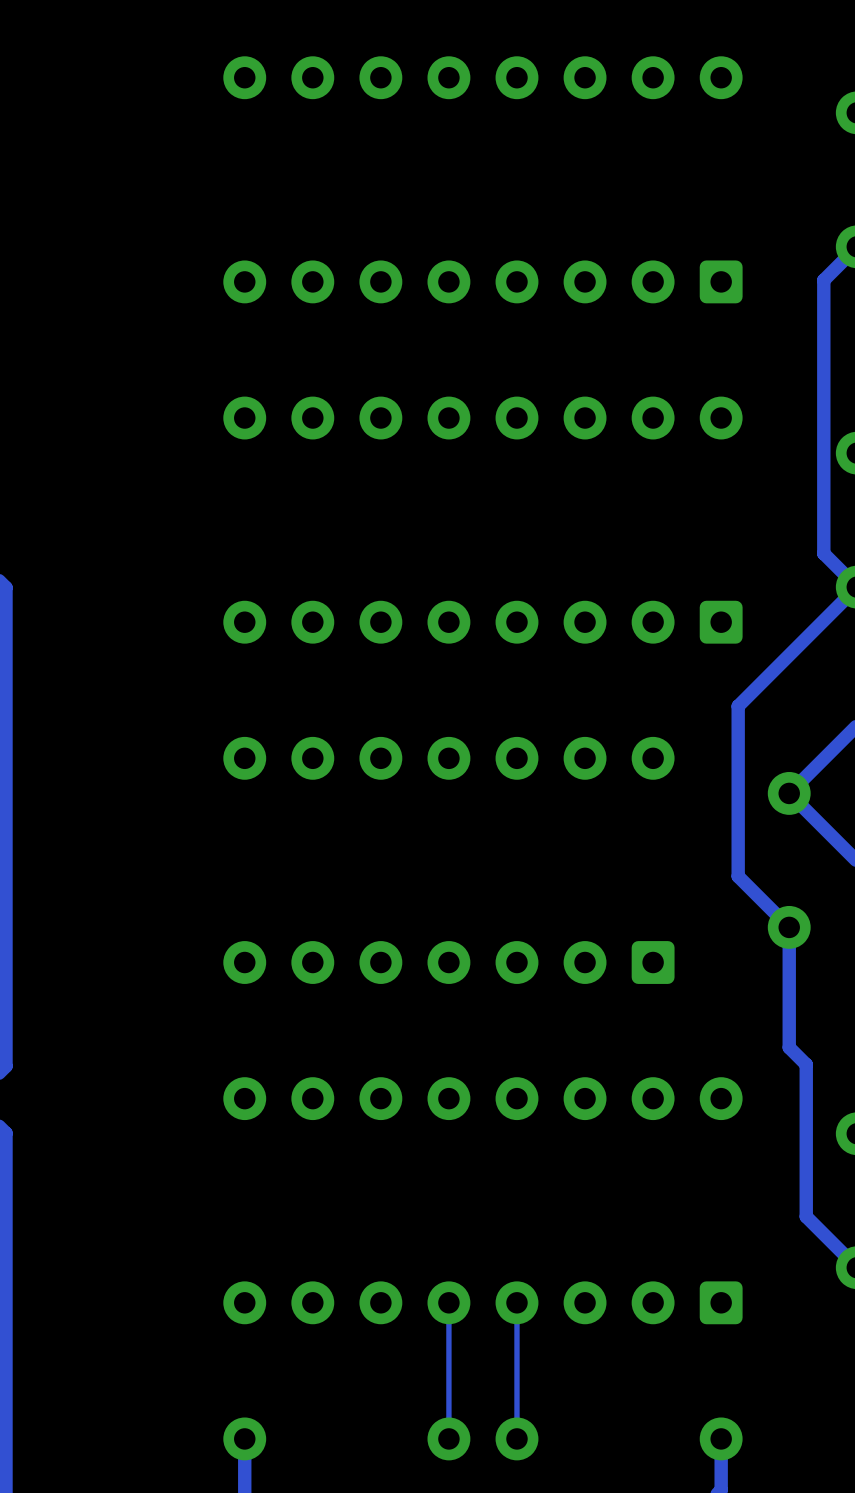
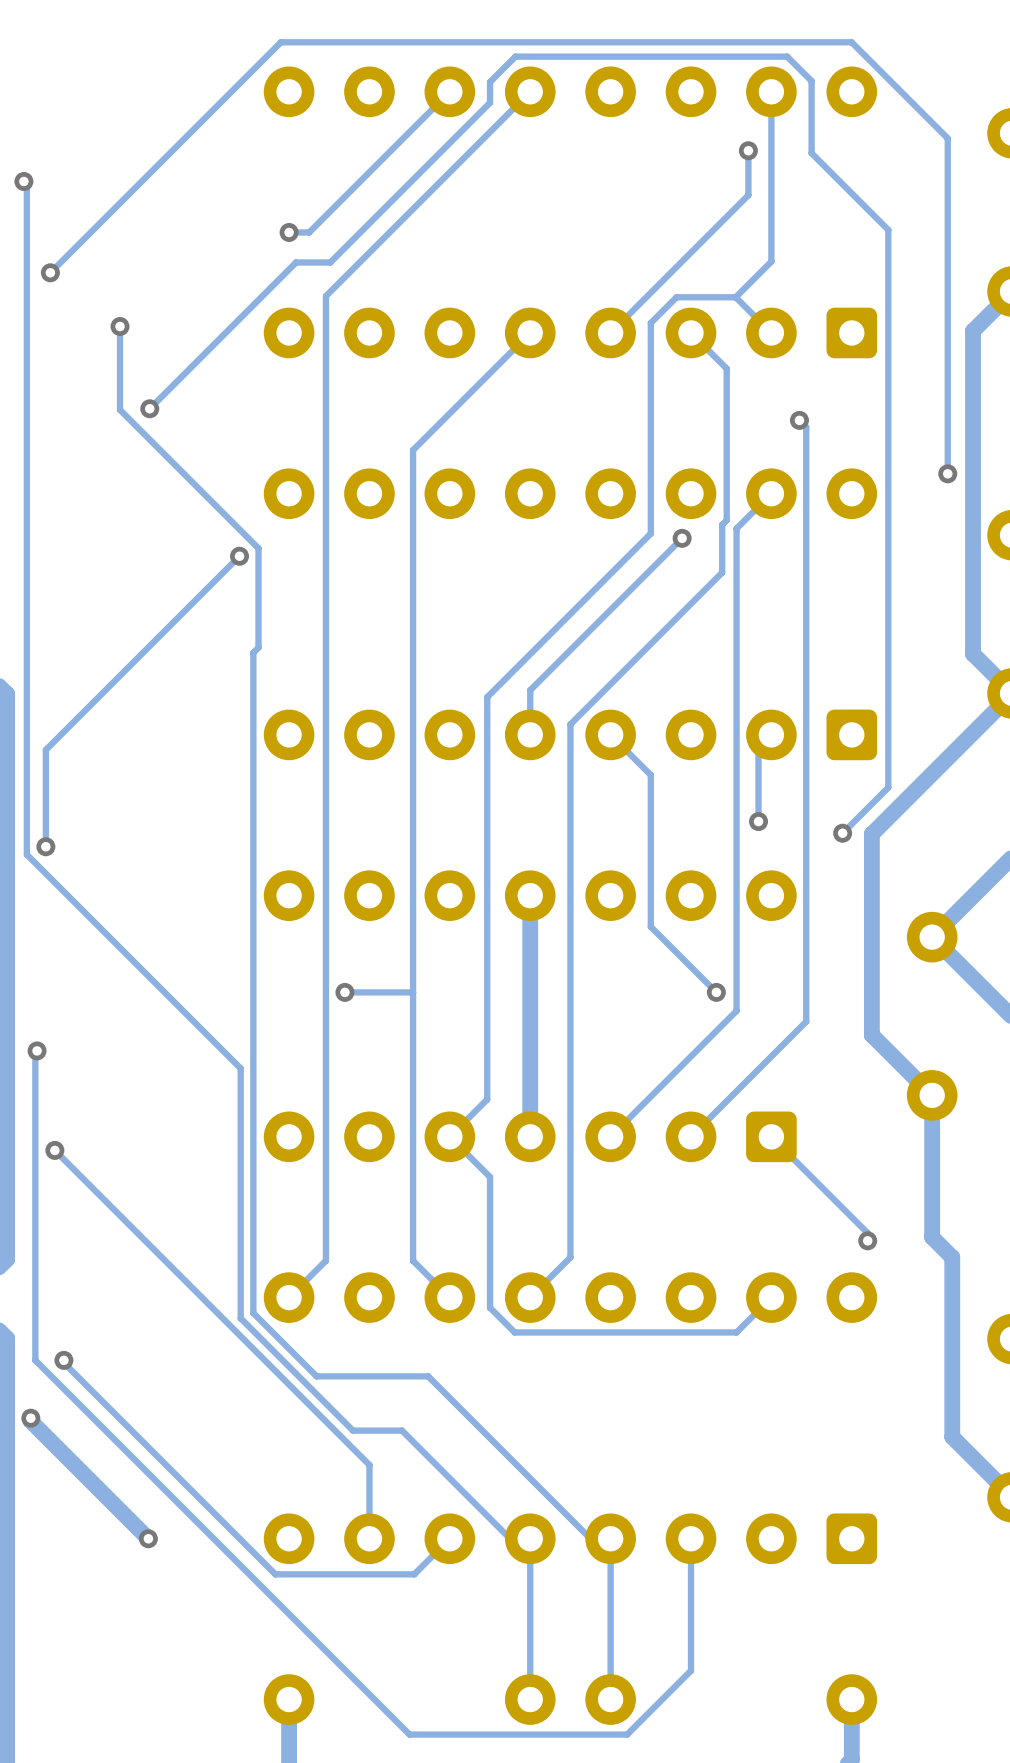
track: none -> (449, 91) (309, 232) (289, 232)
track: none -> (530, 91) (325, 296) (325, 1260) (289, 1297)
track: none -> (771, 91) (771, 261) (735, 297)
track: none -> (748, 150) (748, 195) (610, 332)
via: none -> (748, 150)
track: none -> (23, 181) (26, 184) (26, 854) (240, 1068) (240, 1318) (352, 1430) (402, 1430) (530, 1558)
via: none -> (23, 181)
via: none -> (289, 232)
track: none -> (50, 272) (280, 42) (851, 42) (947, 138) (947, 473)
via: none -> (50, 272)
track: none -> (735, 297) (676, 297) (650, 322) (650, 533) (487, 697) (487, 1099) (449, 1136) (490, 1177) (490, 1307) (514, 1332) (736, 1332) (771, 1297)
track: none -> (735, 297) (771, 332)
track: none -> (120, 326) (120, 409) (258, 548) (258, 647) (253, 652) (253, 1313) (316, 1376) (428, 1376) (610, 1558)
via: none -> (120, 326)
track: none -> (530, 332) (413, 450) (413, 1260) (449, 1297)
track: none -> (691, 332) (726, 368) (726, 520) (722, 524) (722, 572) (570, 724) (570, 1257) (530, 1297)
track: none -> (149, 408) (296, 262) (330, 262) (490, 102) (490, 82) (515, 56) (787, 56) (811, 81) (811, 153) (888, 229) (888, 787) (842, 833)
via: none -> (149, 408)
track: none -> (799, 420) (806, 427) (806, 1021) (691, 1136)
via: none -> (799, 420)
via: none -> (947, 473)
track: none -> (771, 493) (736, 528) (736, 1010) (610, 1136)
track: none -> (682, 538) (530, 690) (530, 734)
via: none -> (682, 538)
track: none -> (239, 556) (45, 749) (45, 846)
via: none -> (239, 556)
track: none -> (610, 734) (650, 775) (650, 926) (716, 992)
track: none -> (771, 734) (758, 747) (758, 821)
via: none -> (758, 821)
via: none -> (842, 833)
via: none -> (45, 846)
track: none -> (530, 895) (530, 1136)
via: none -> (344, 992)
track: none -> (413, 992) (344, 992)
via: none -> (716, 992)
track: none -> (37, 1050) (35, 1052) (35, 1360) (409, 1734) (627, 1734) (691, 1670) (691, 1538)
via: none -> (37, 1050)
track: none -> (771, 1136) (867, 1233) (867, 1240)
track: none -> (54, 1150) (369, 1465) (369, 1538)
via: none -> (54, 1150)
via: none -> (867, 1240)
track: none -> (63, 1360) (63, 1362) (275, 1574) (414, 1574) (449, 1538)
via: none -> (63, 1360)
track: none -> (30, 1418) (30, 1421) (148, 1538)
via: none -> (30, 1418)
via: none -> (148, 1538)

